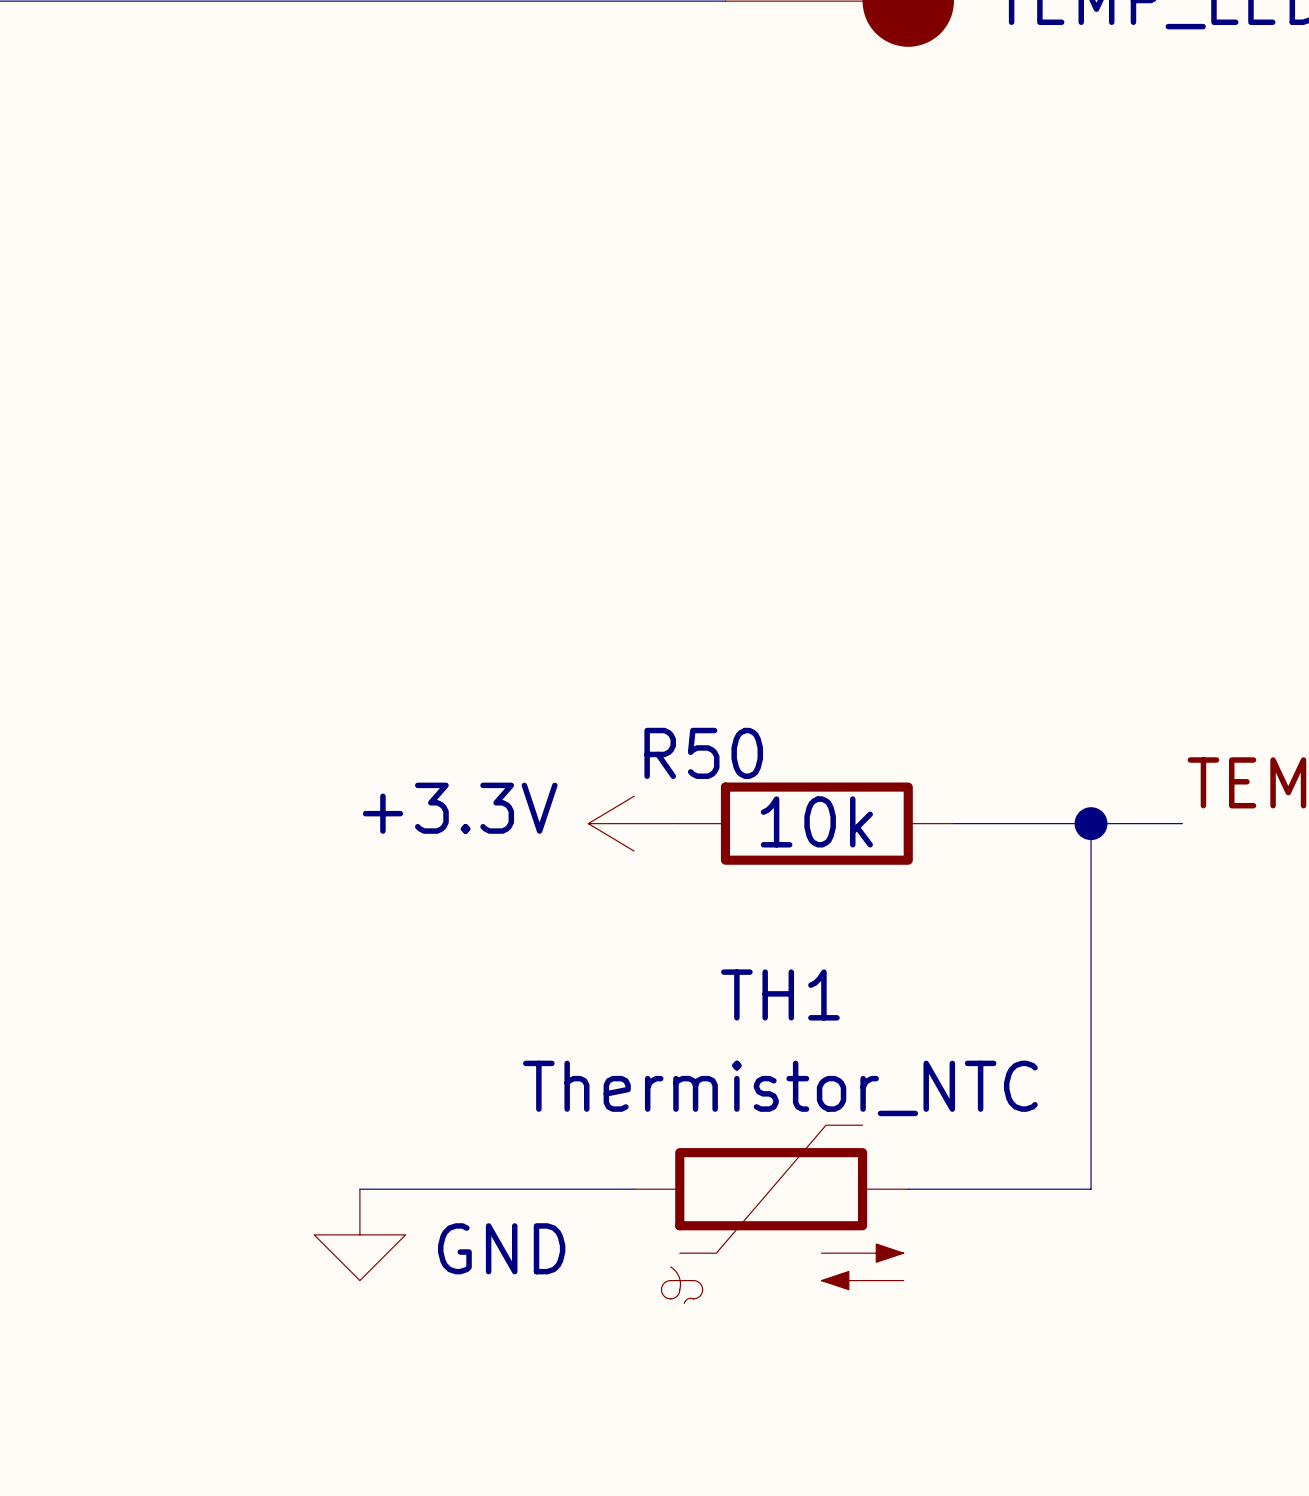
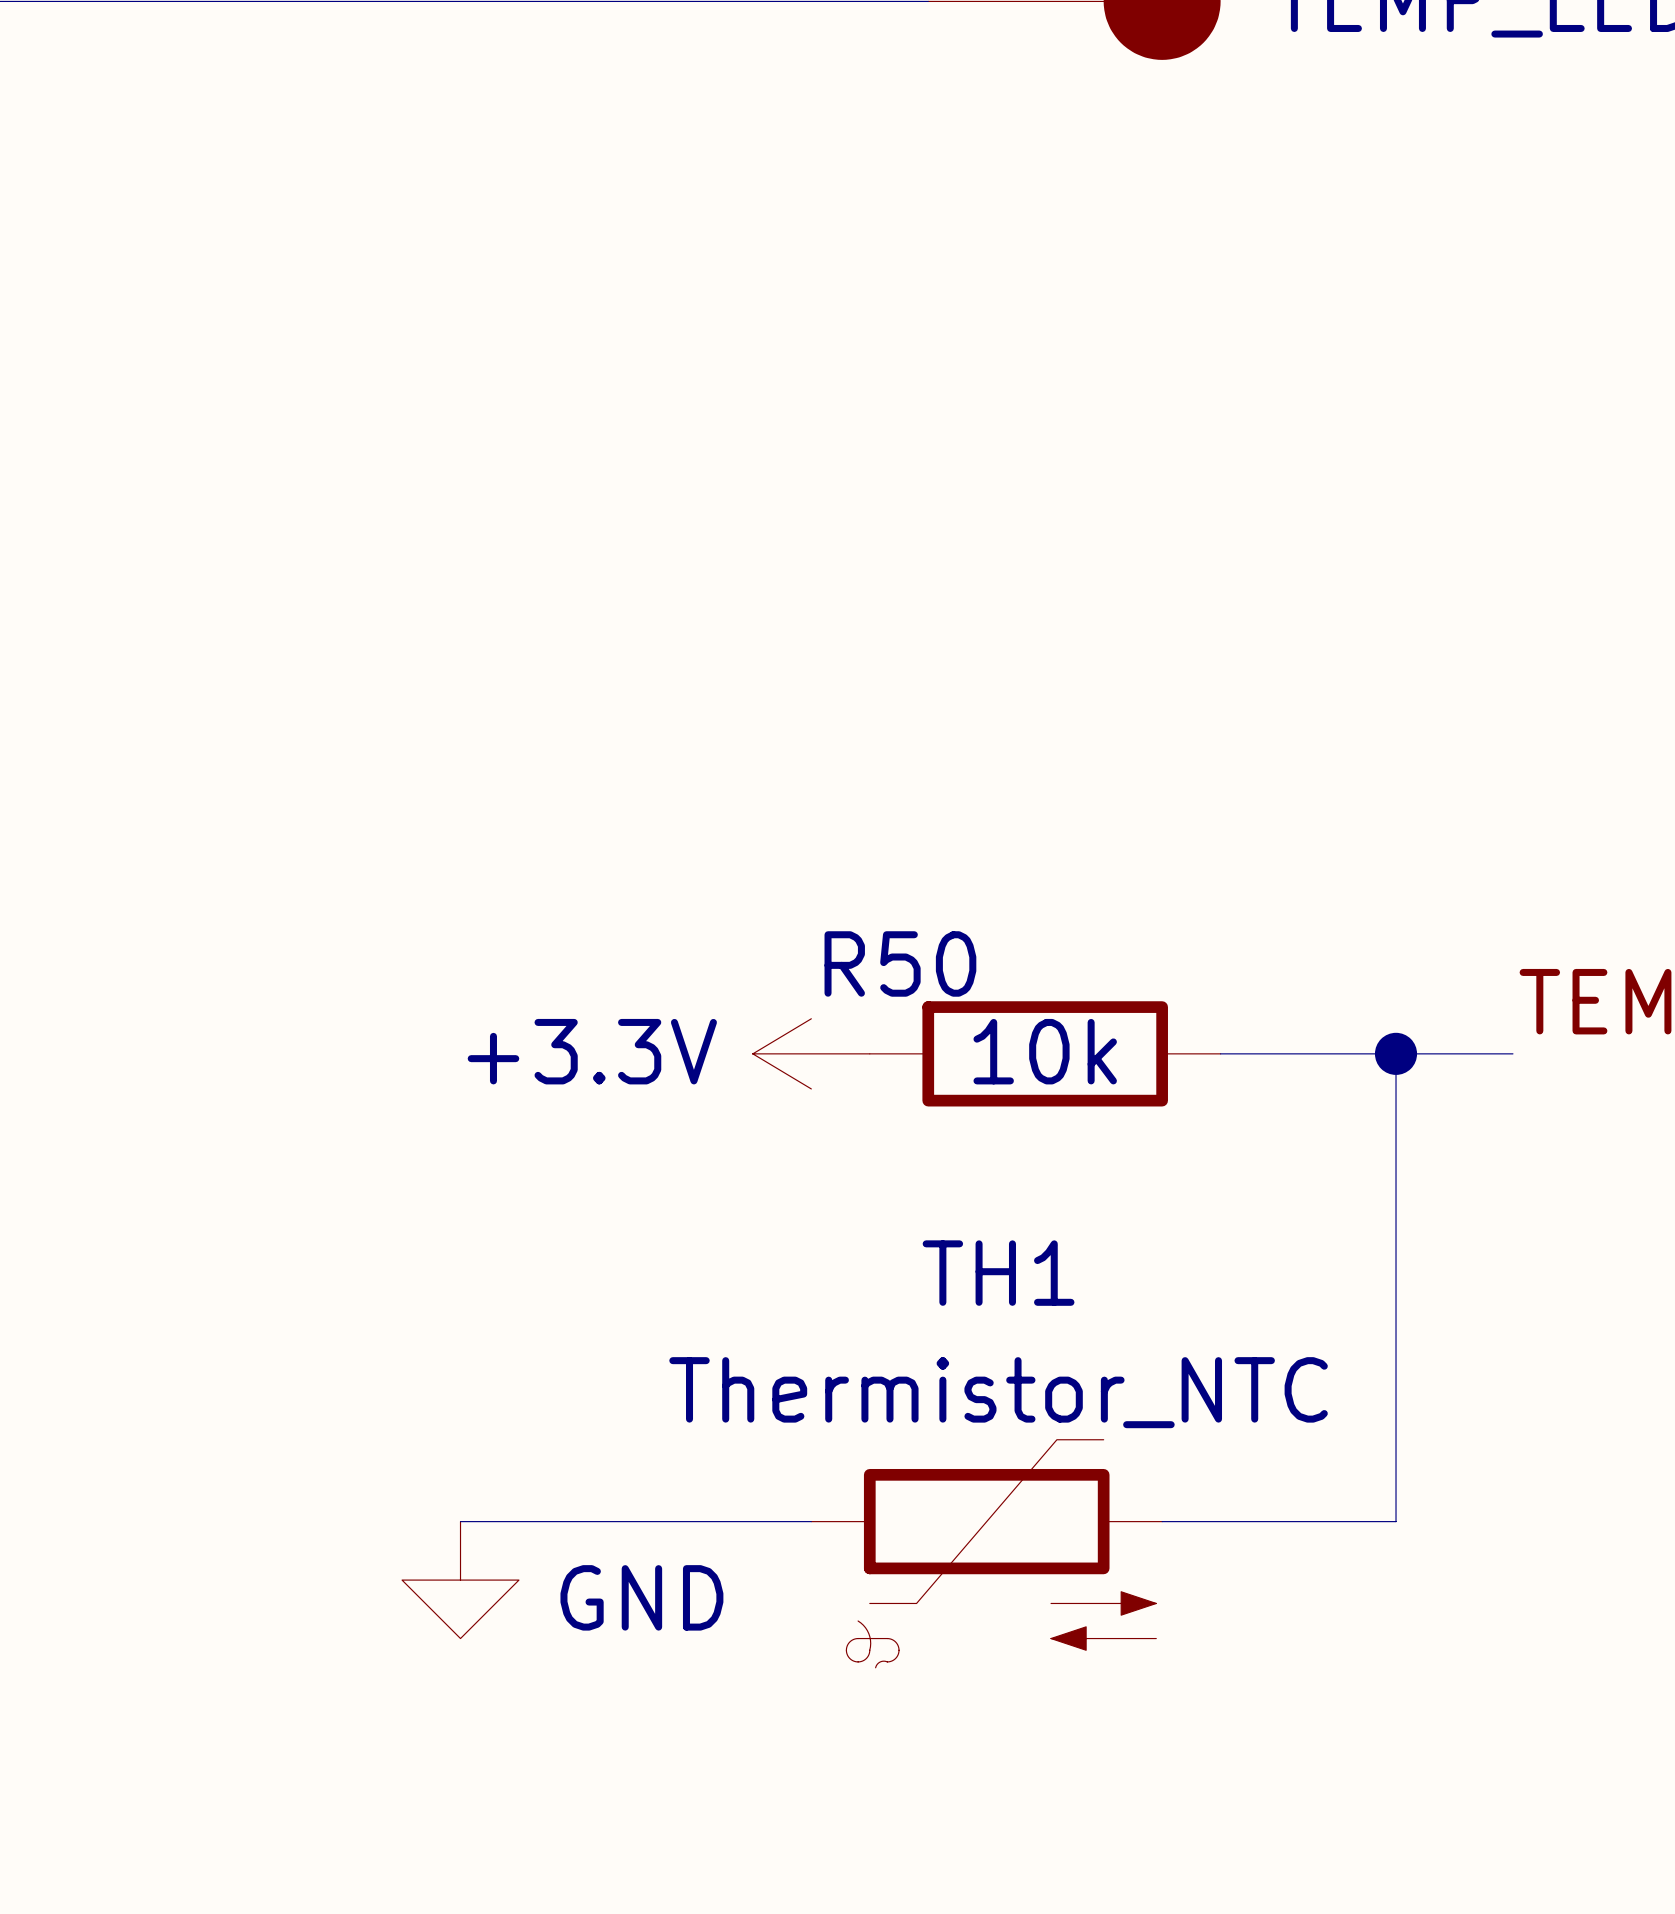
power symbol text position: +3.3V (460, 808) -> +3.3V (592, 1051)

